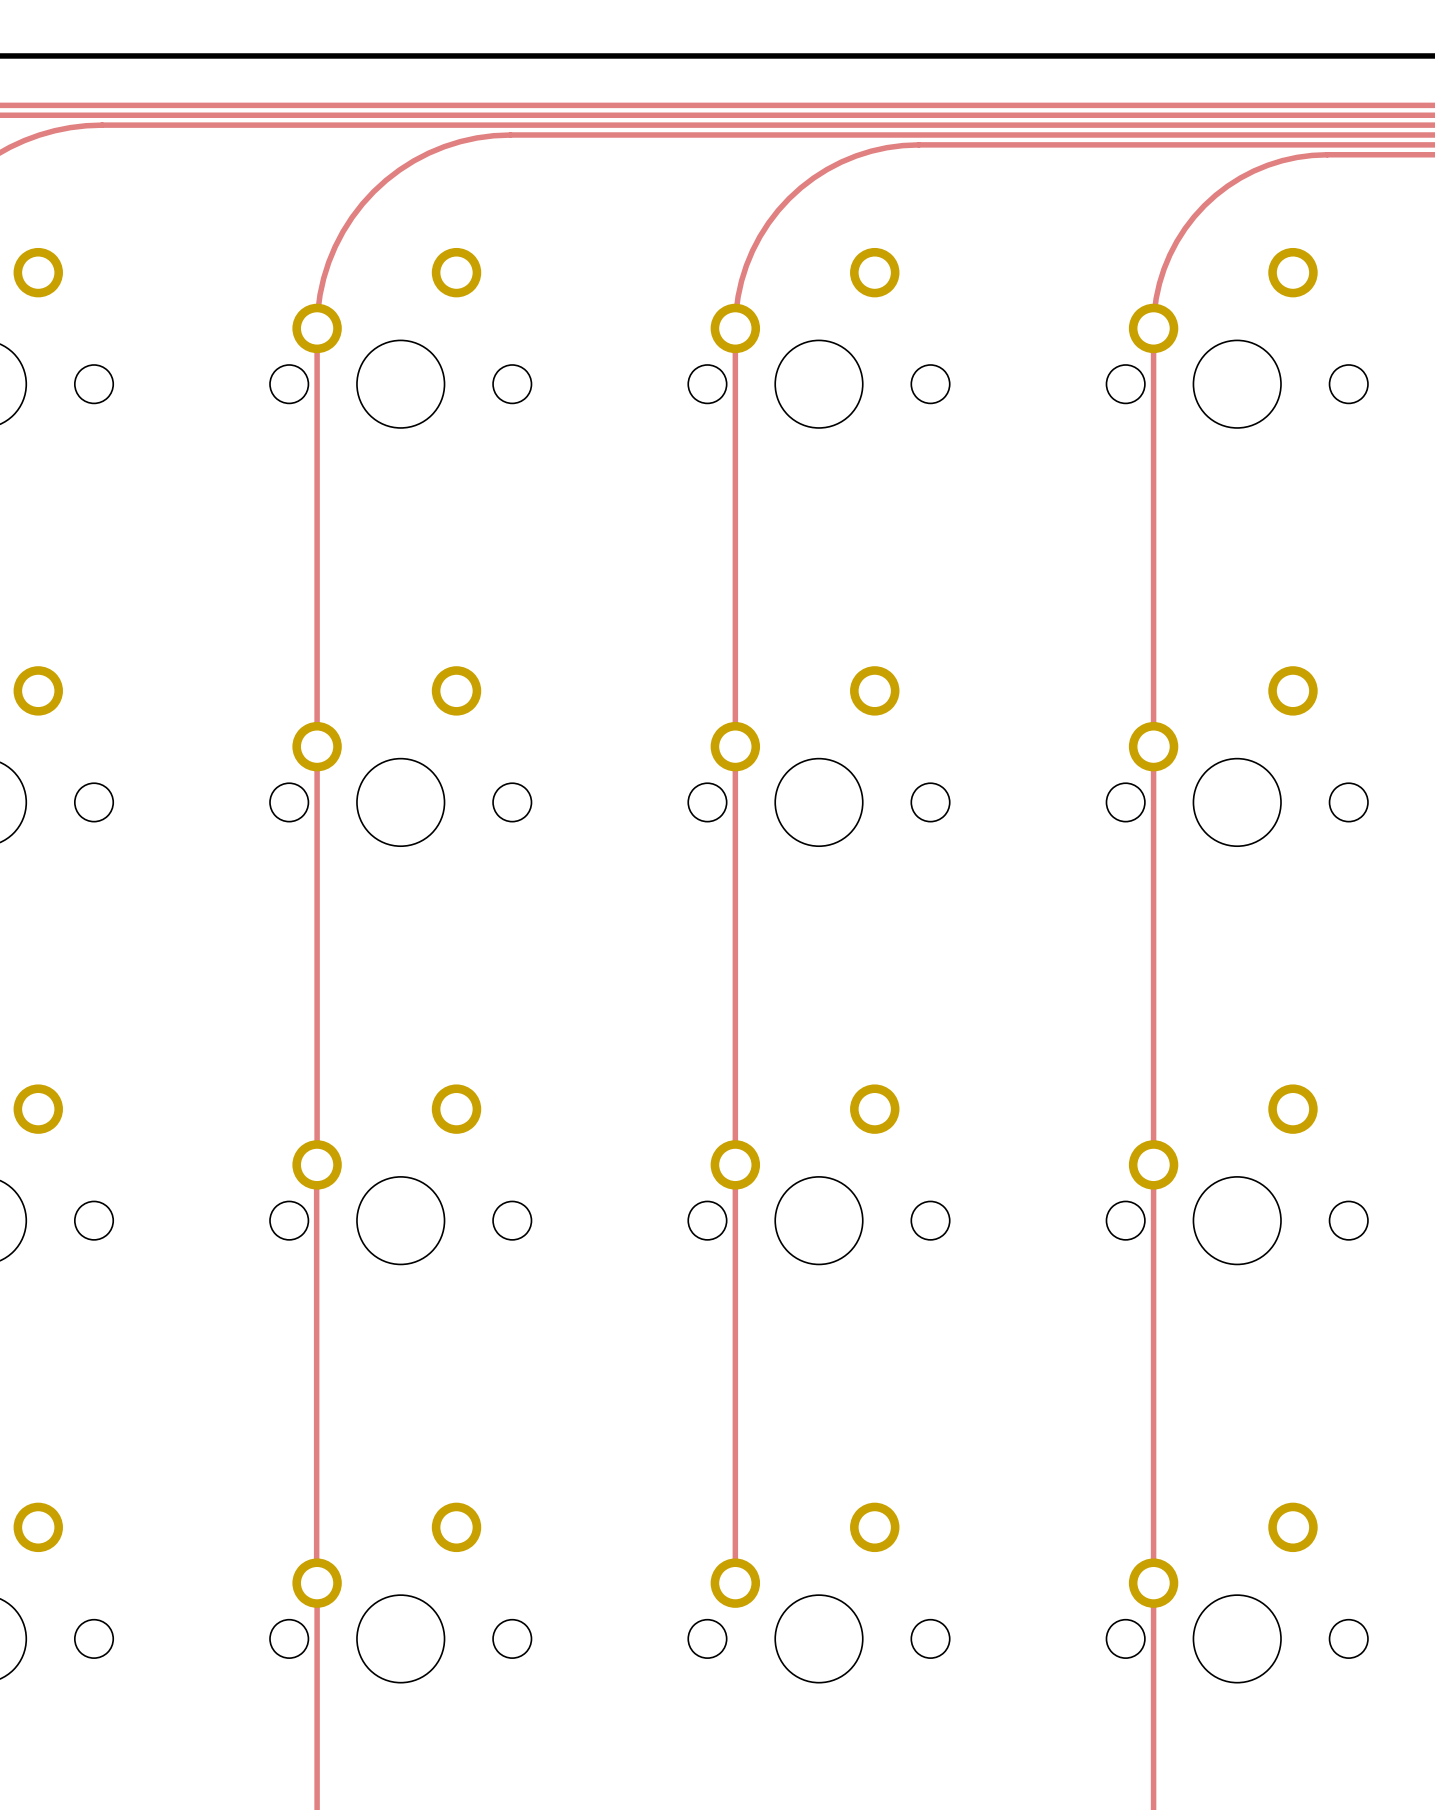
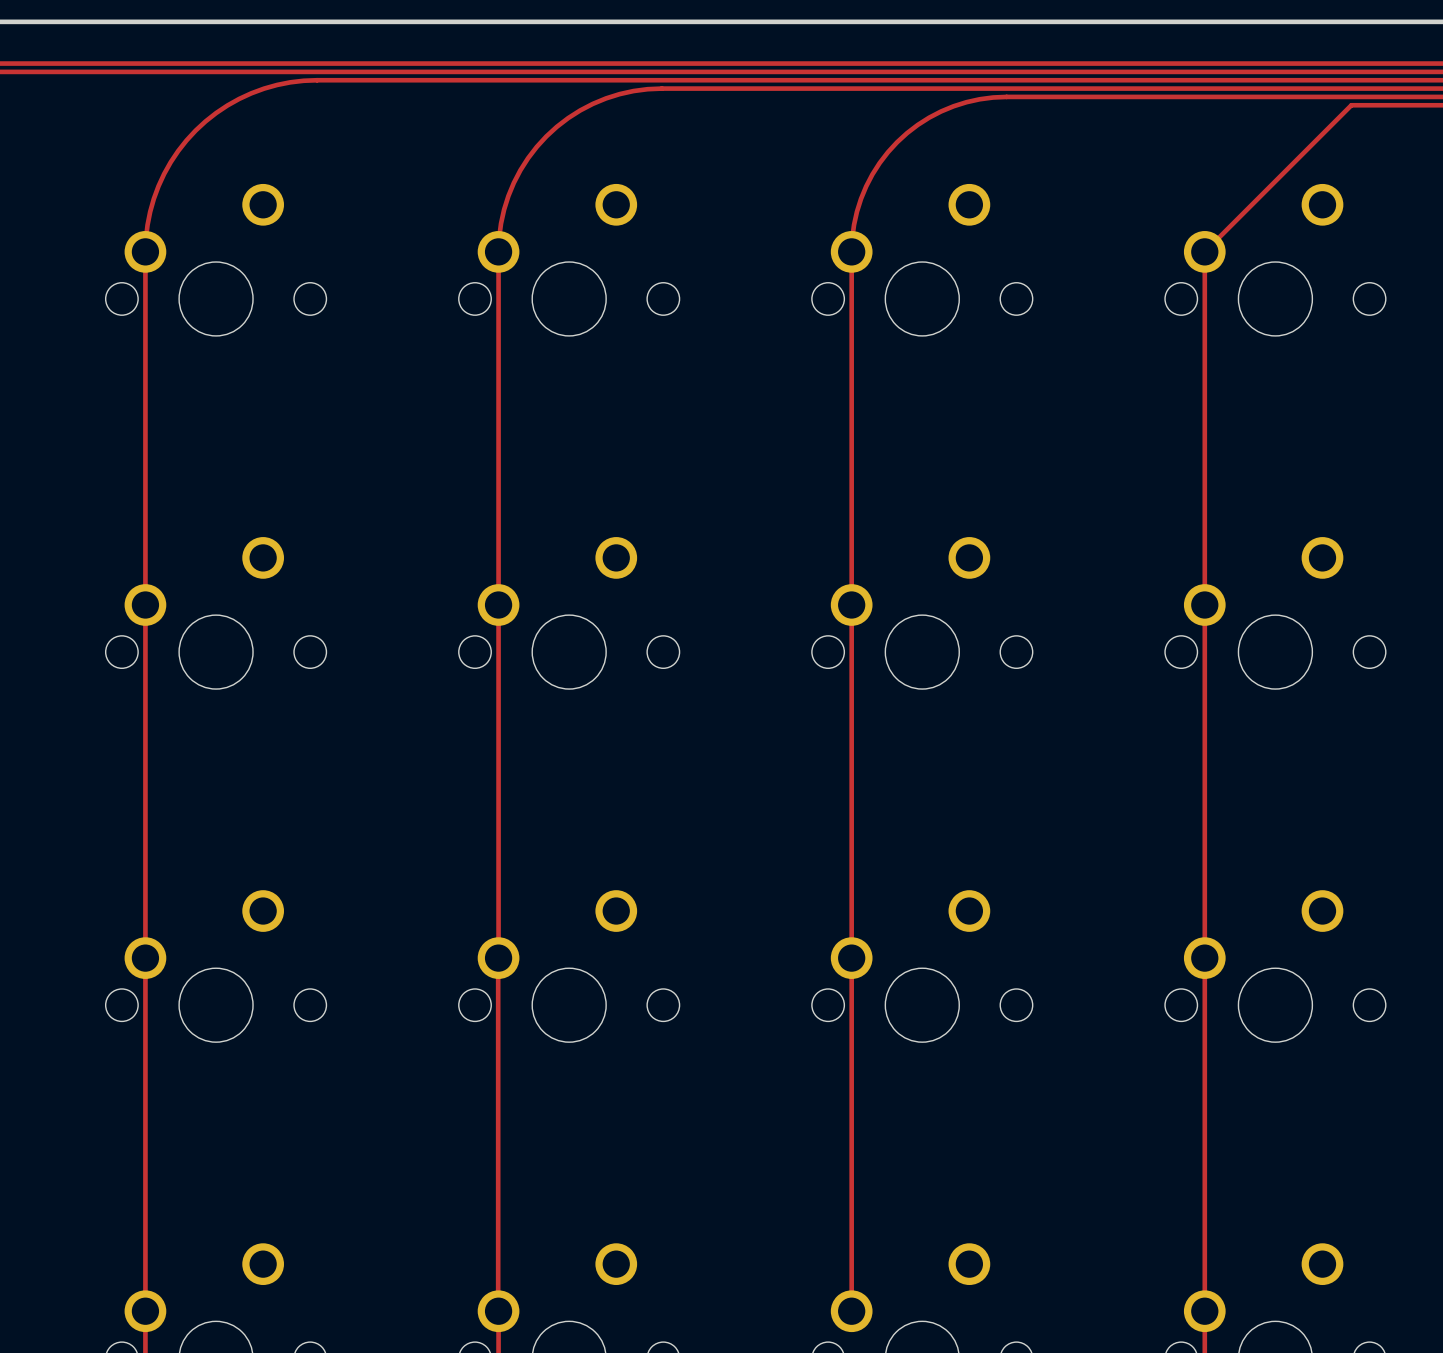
track: (1327, 154) (1282, 160) (1253, 171) (1227, 186) (1204, 205) (1176, 241) (1164, 269) (1156, 298) (1153, 328) -> (1351, 105) (1204, 251)

